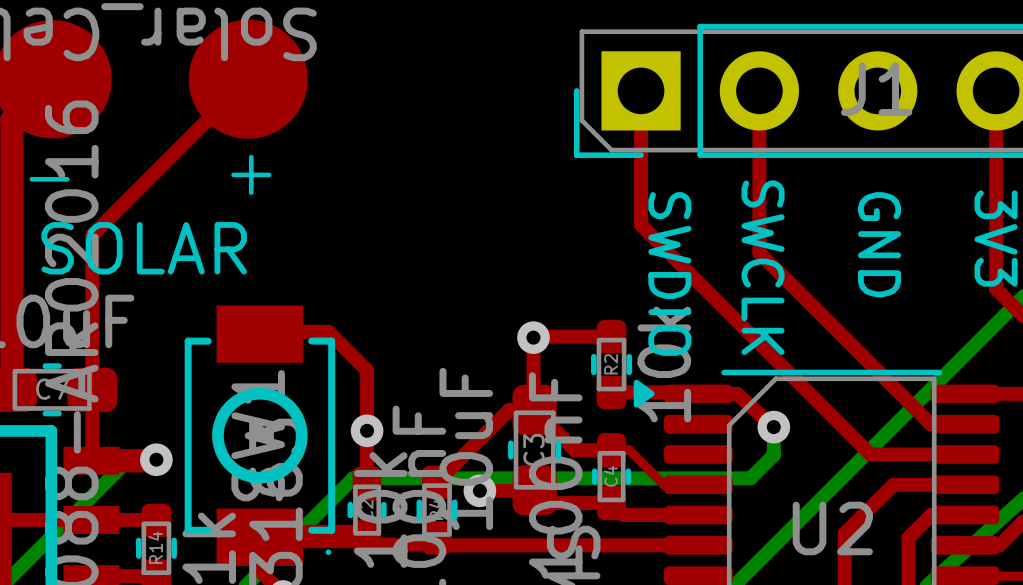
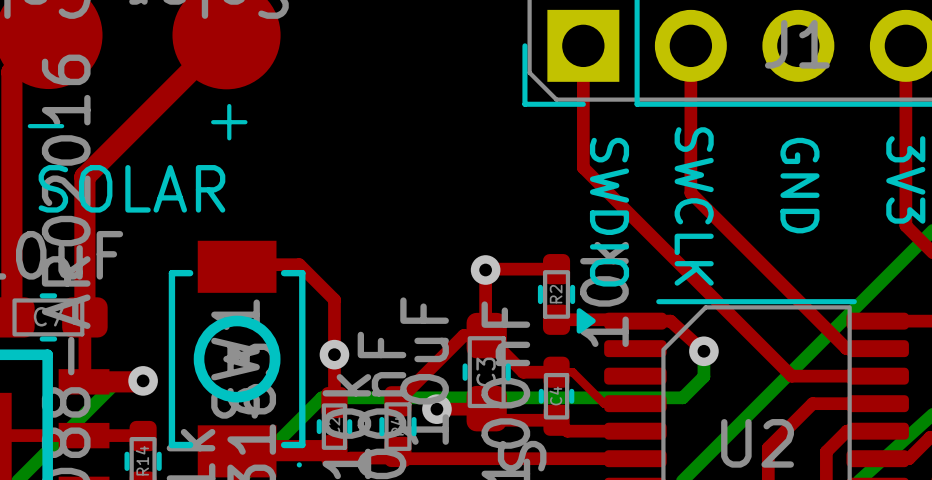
top track width: thin (248, 79) (92, 235) (92, 389) -> thick (226, 35) (84, 176) (84, 317)

